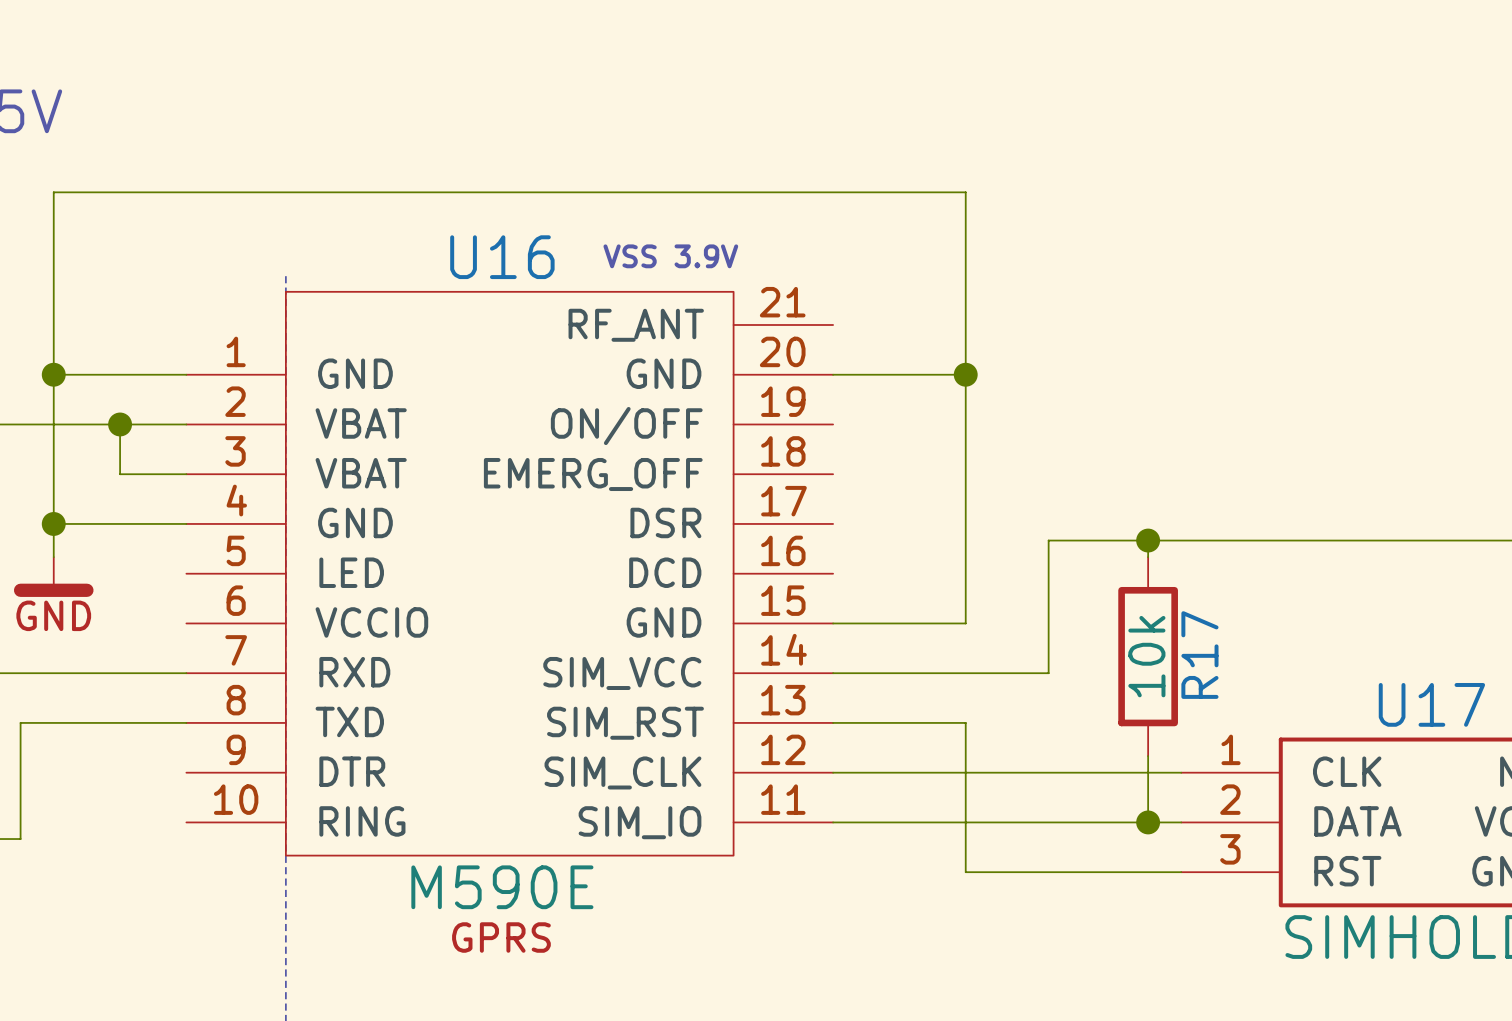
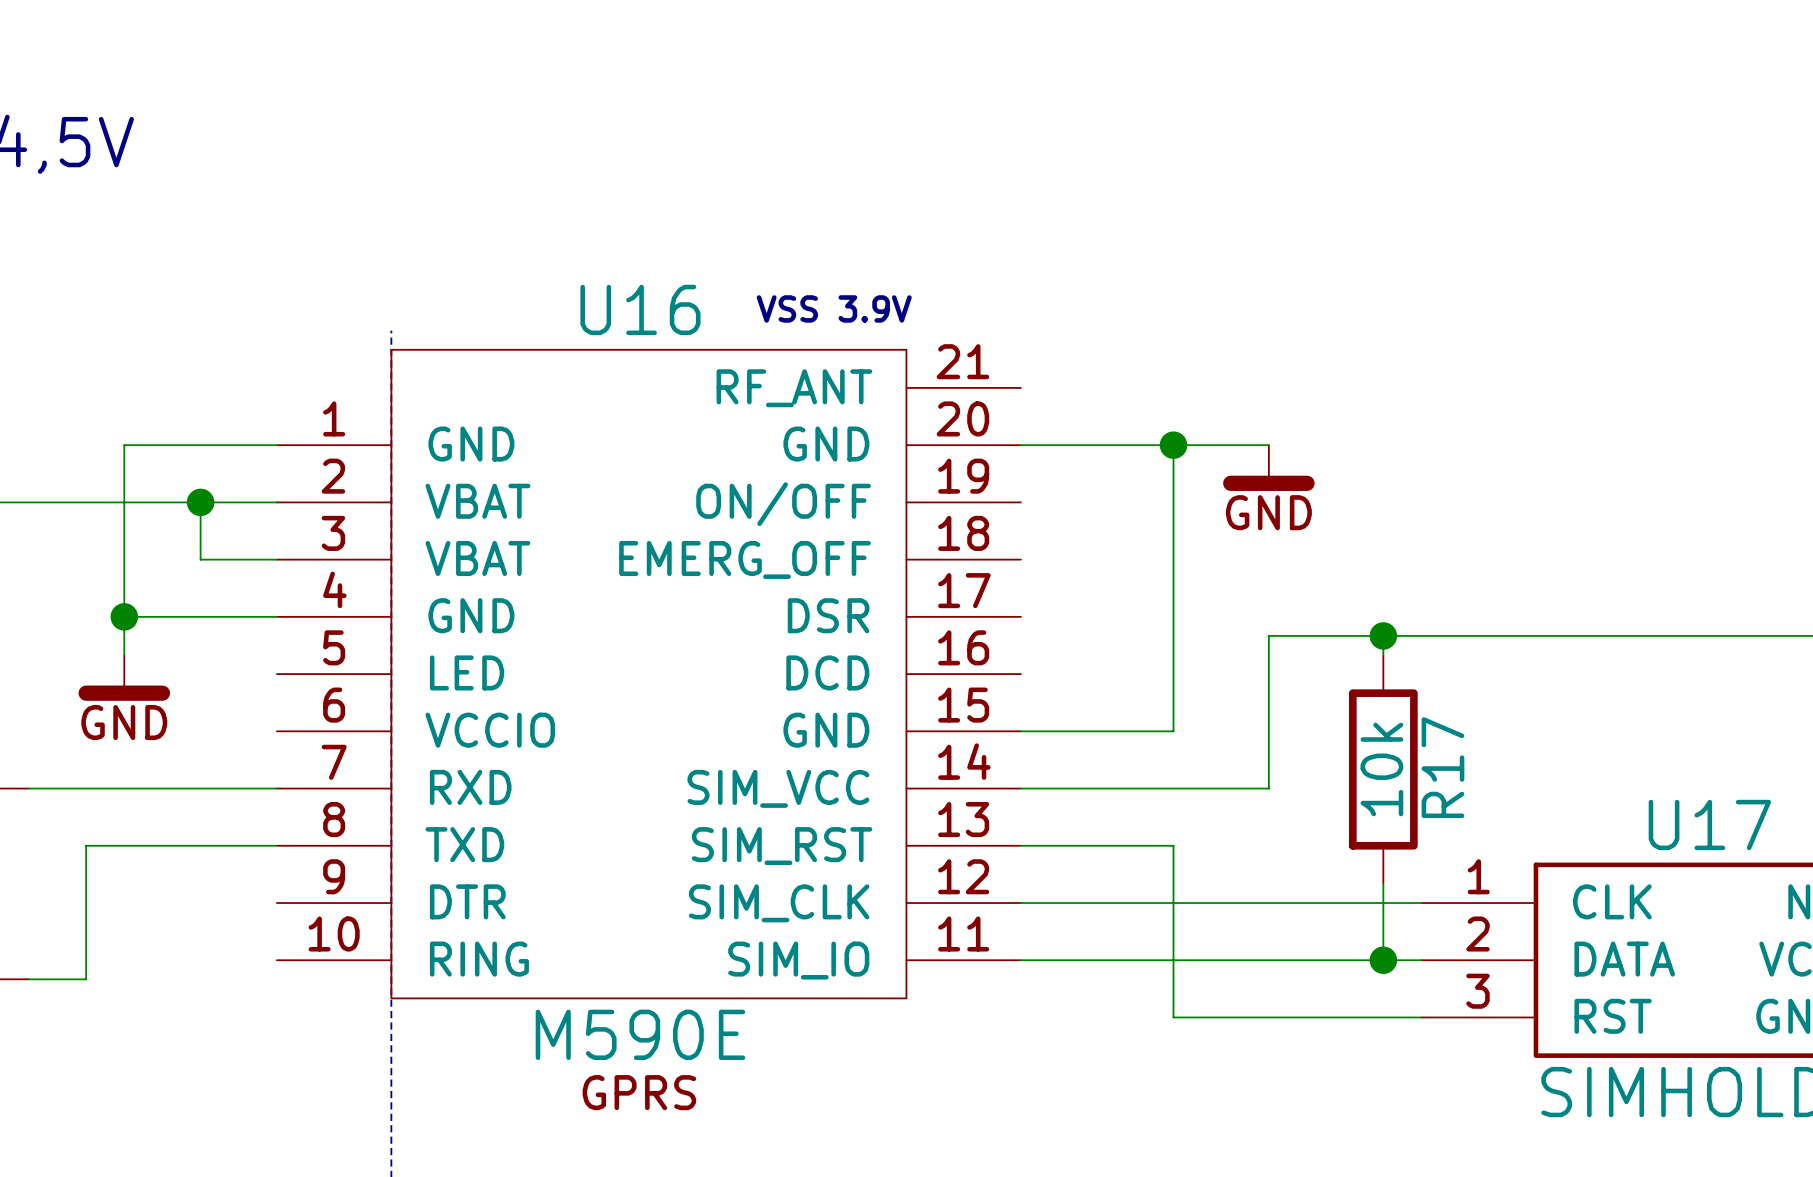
wire: (53, 374) (53, 192) (965, 192) (965, 374) -> (1268, 445) (1173, 445)
junction: (53, 374) -> none
power symbol: none -> (1268, 468)

